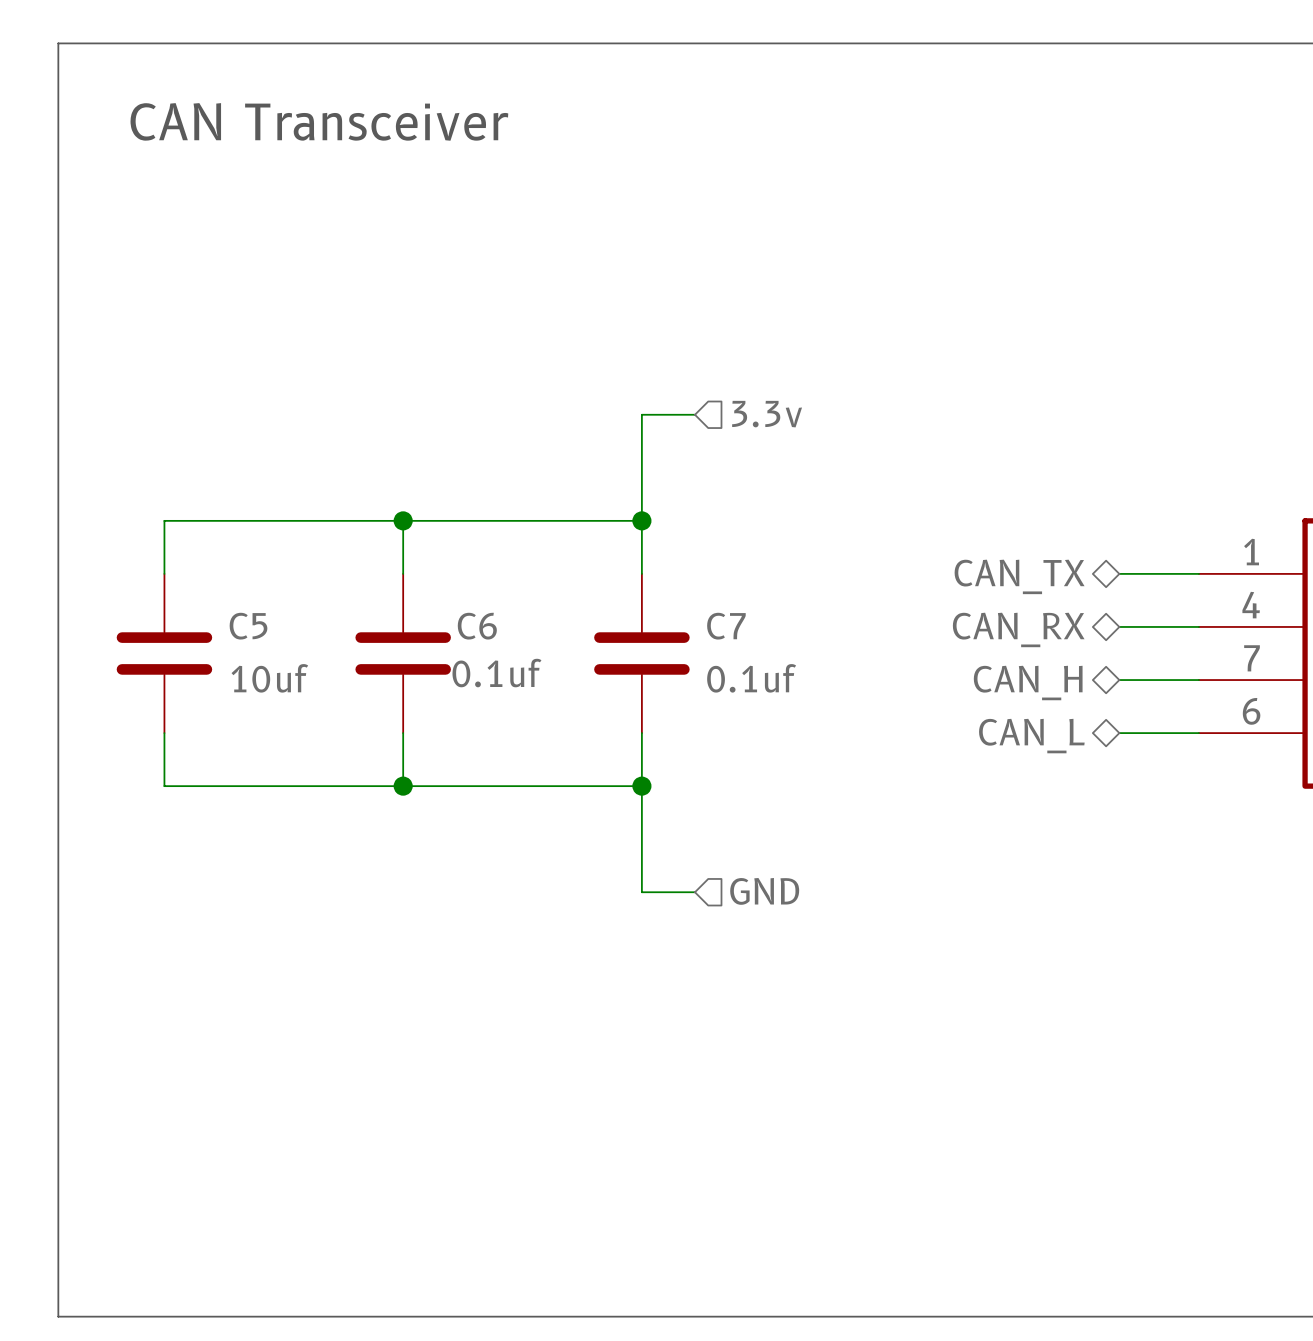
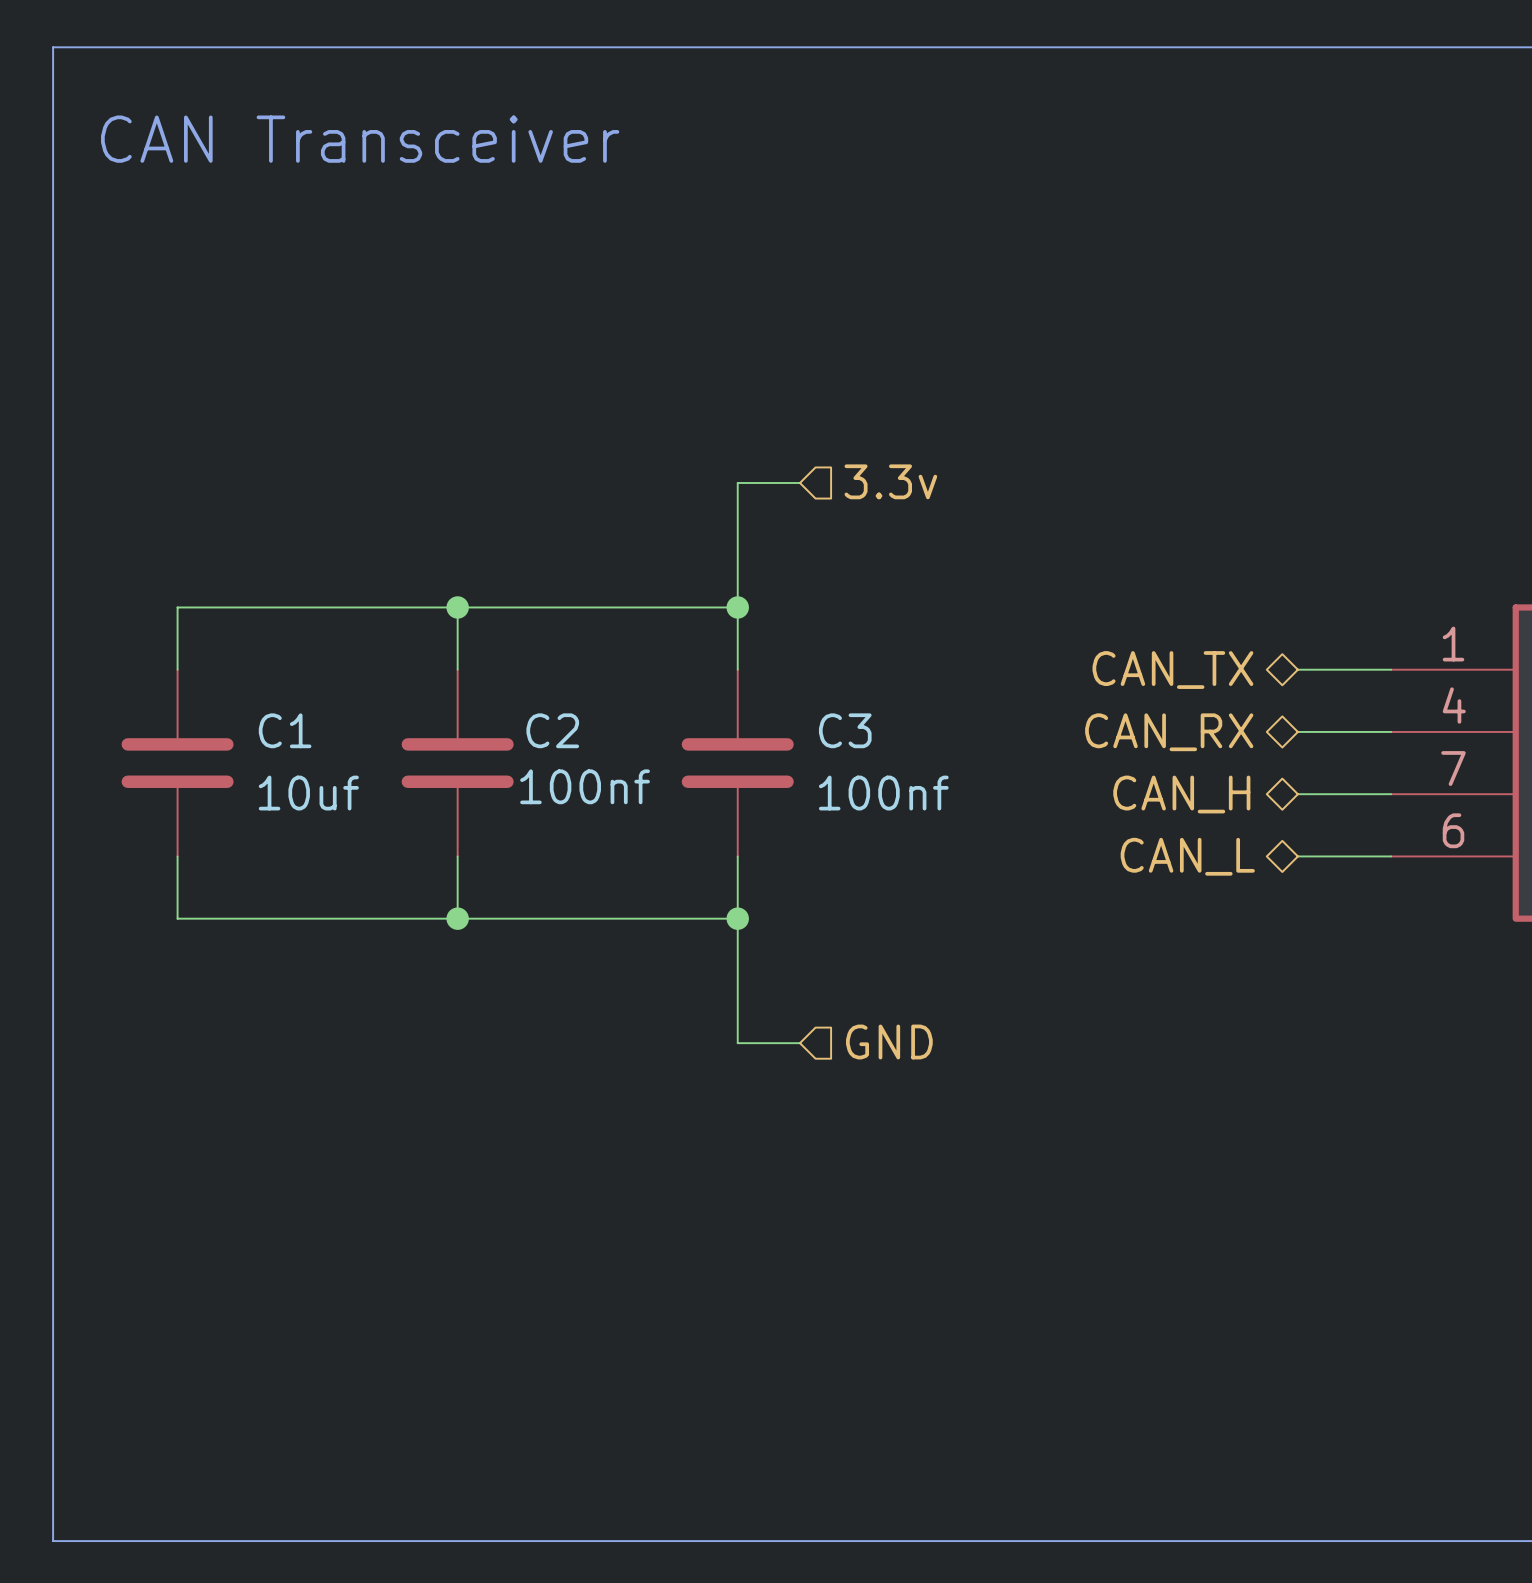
C5 name: C5 (248, 626) -> C1 (285, 730)
C6 name: C6 (477, 626) -> C2 (552, 730)
C7 name: C7 (726, 626) -> C3 (845, 730)
C6 value: 0.1uf (496, 673) -> 100nf (585, 786)
C7 value: 0.1uf (751, 678) -> 100nf (883, 793)

